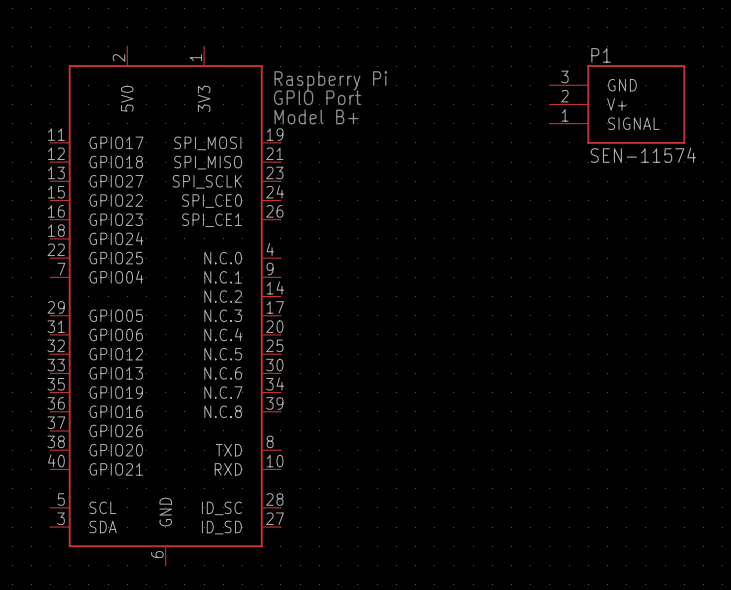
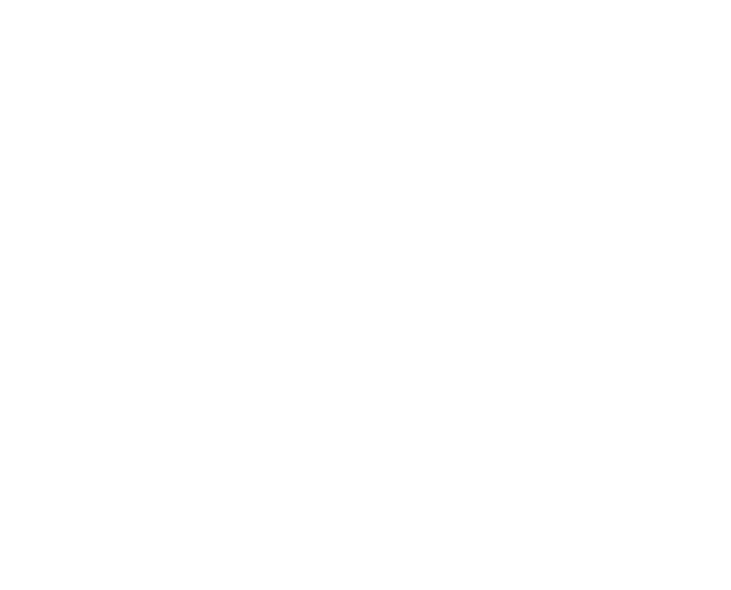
P1: SEN-11574 (617, 104) -> none
part: (165, 306) -> none

